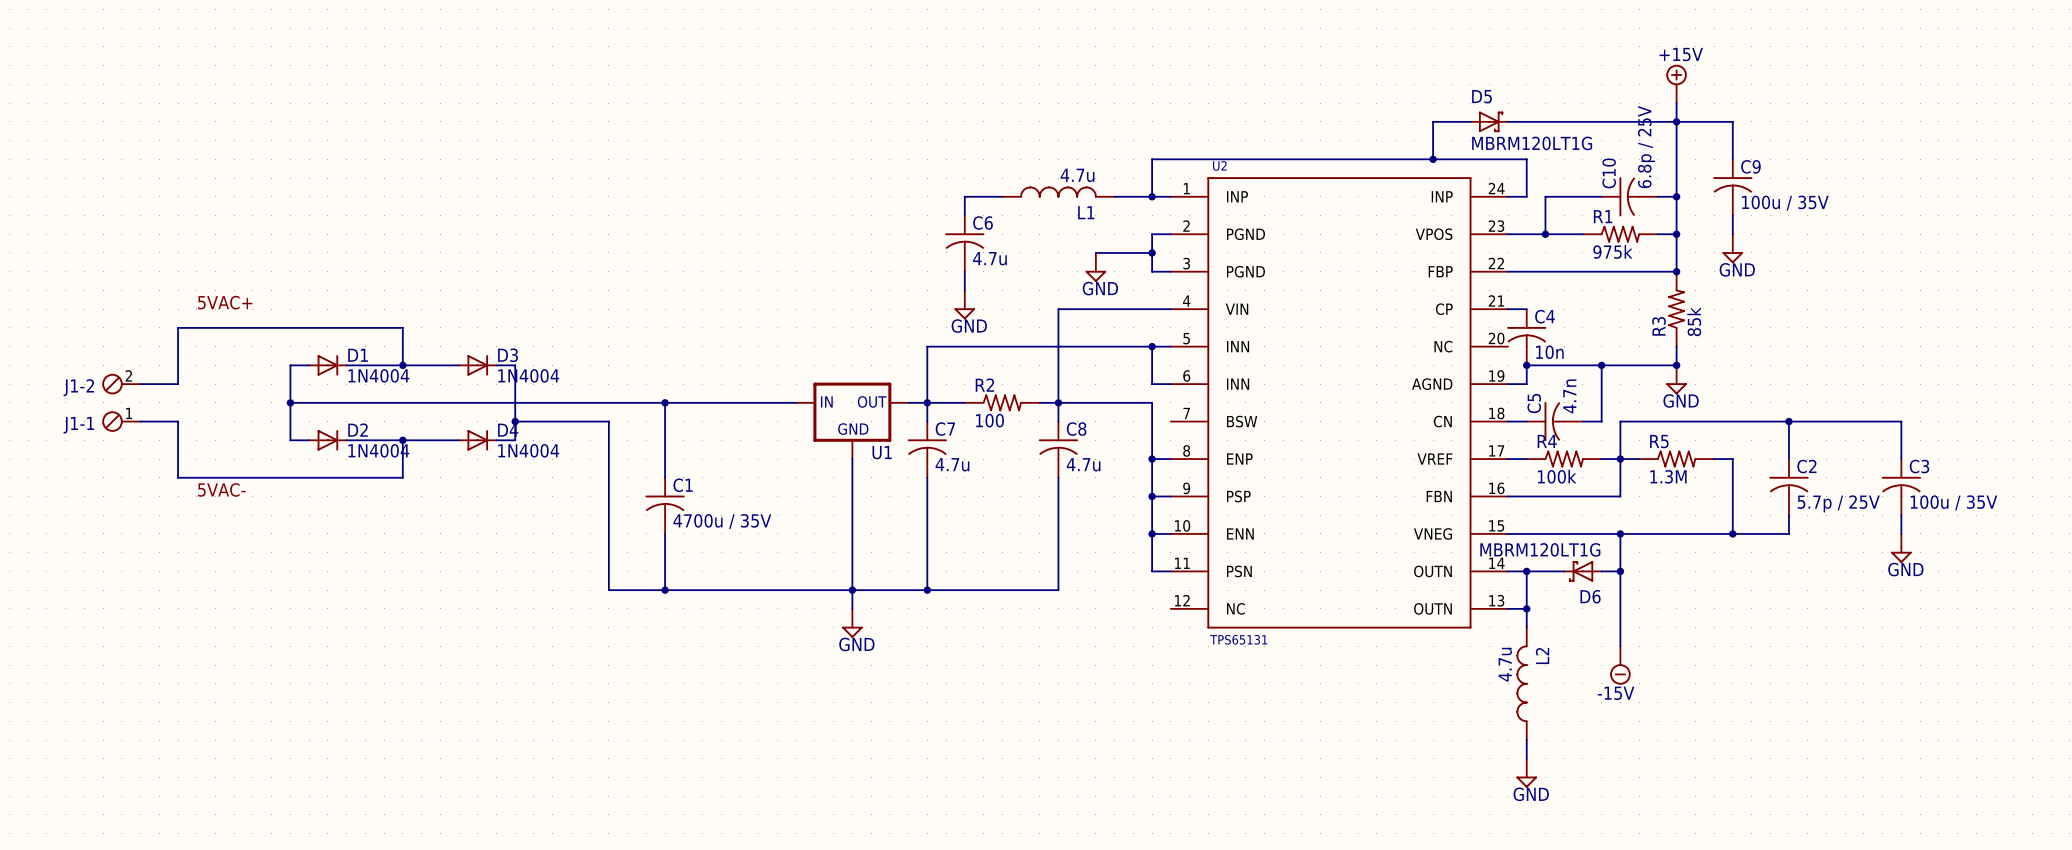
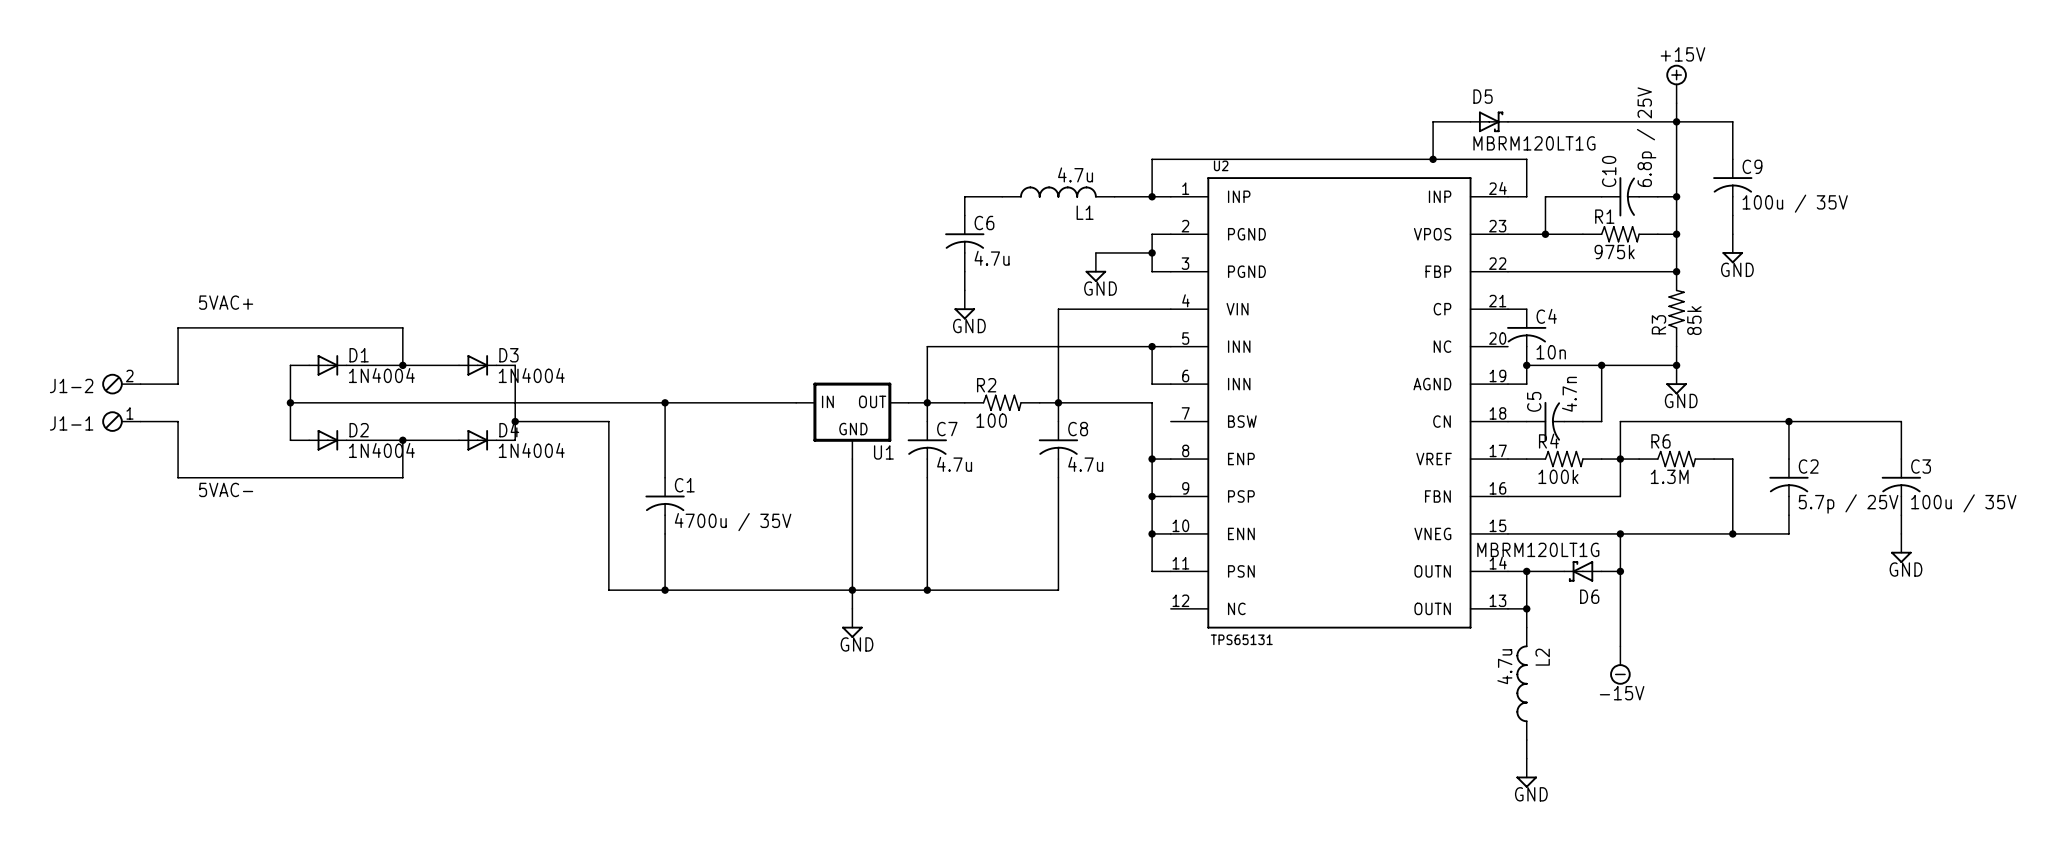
R5 name: R5 (1659, 441) -> R6 (1660, 441)

